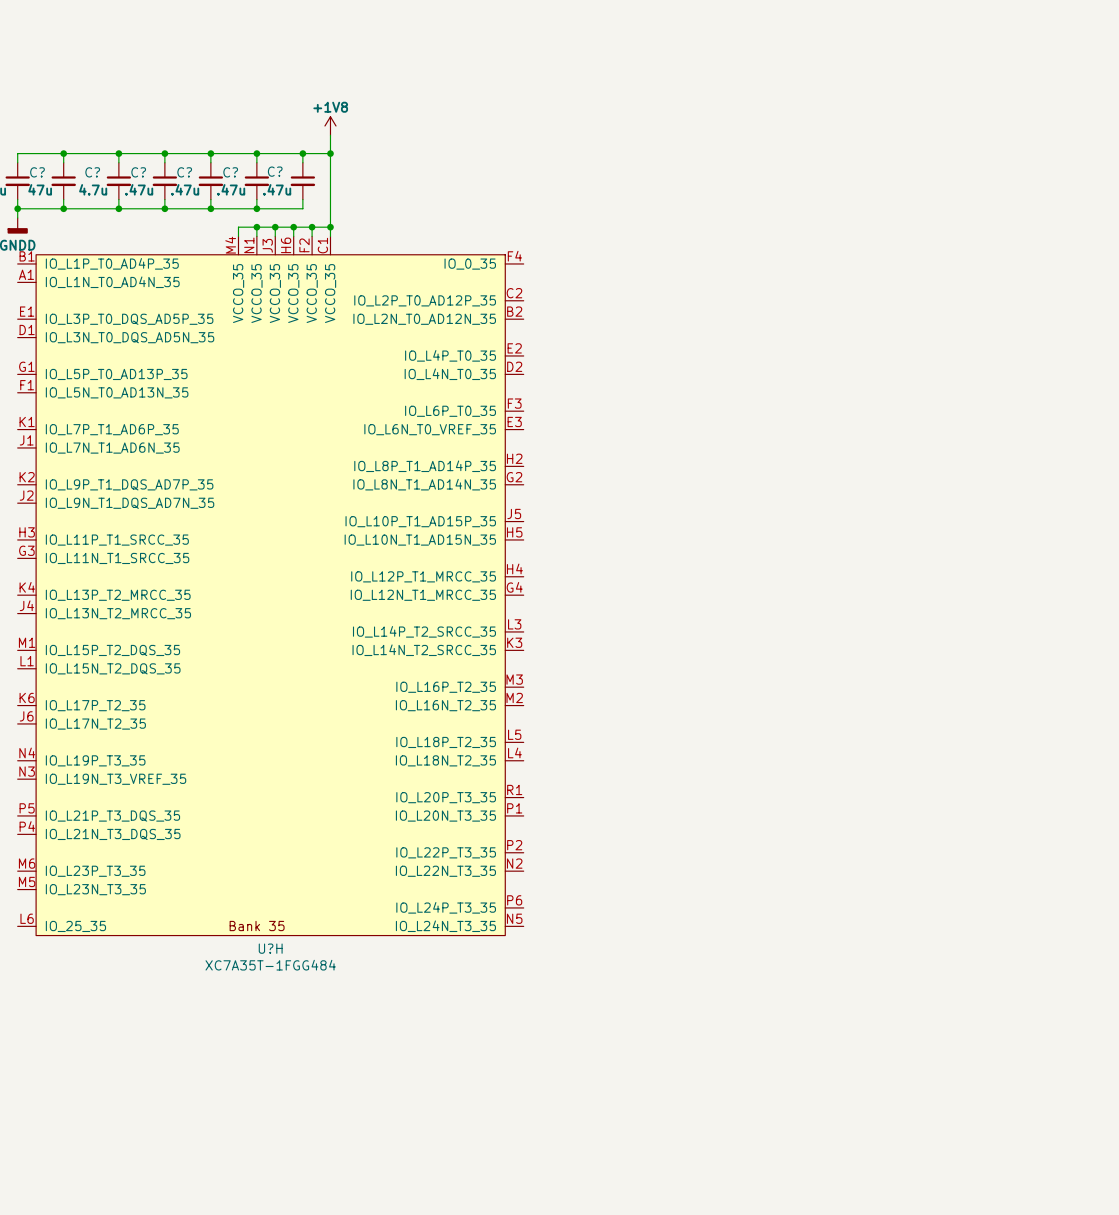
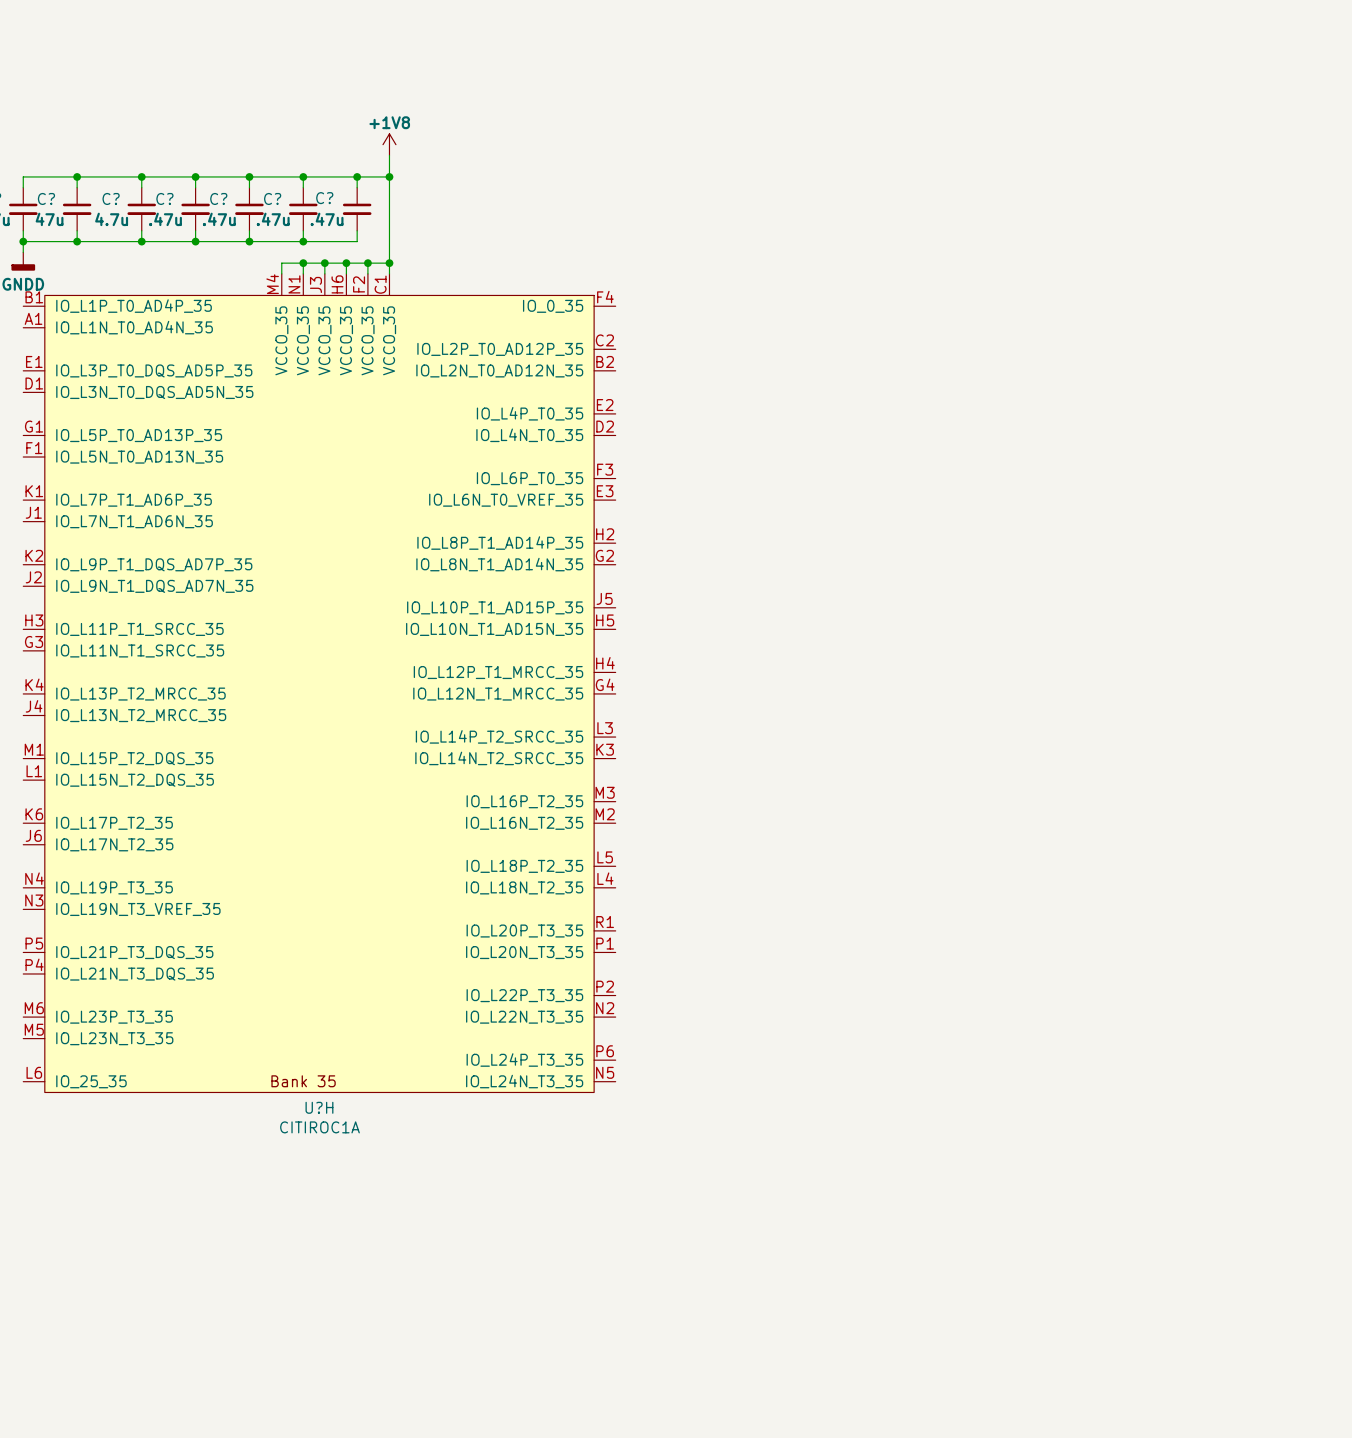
U?H value: XC7A35T-1FGG484 (270, 965) -> CITIROC1A (319, 1127)

